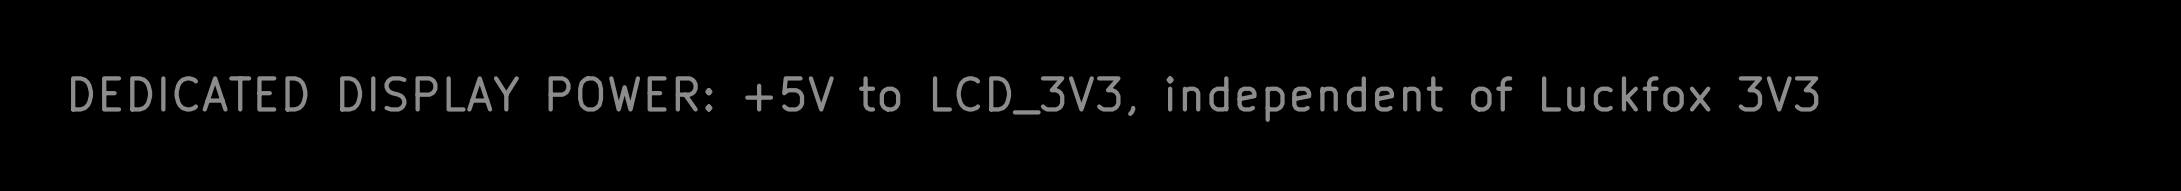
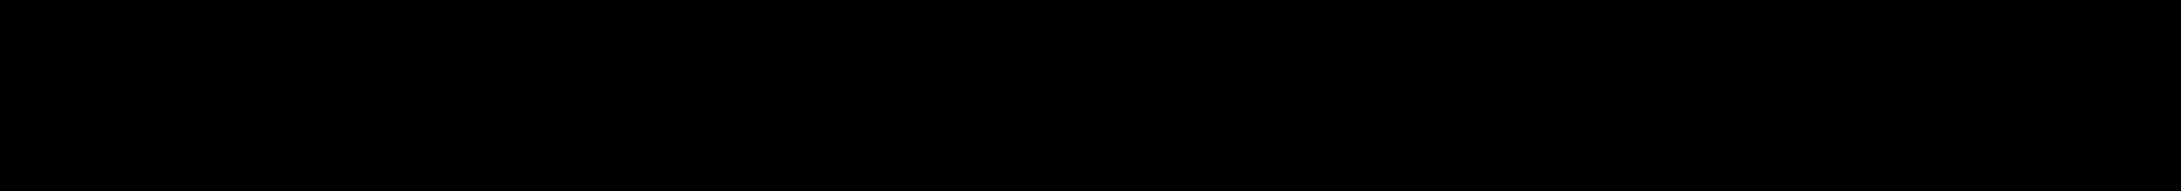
text: DEDICATED DISPLAY POWER: +5V to LCD_3V3, independent of Luckfox 3V3 (944, 99) -> none

